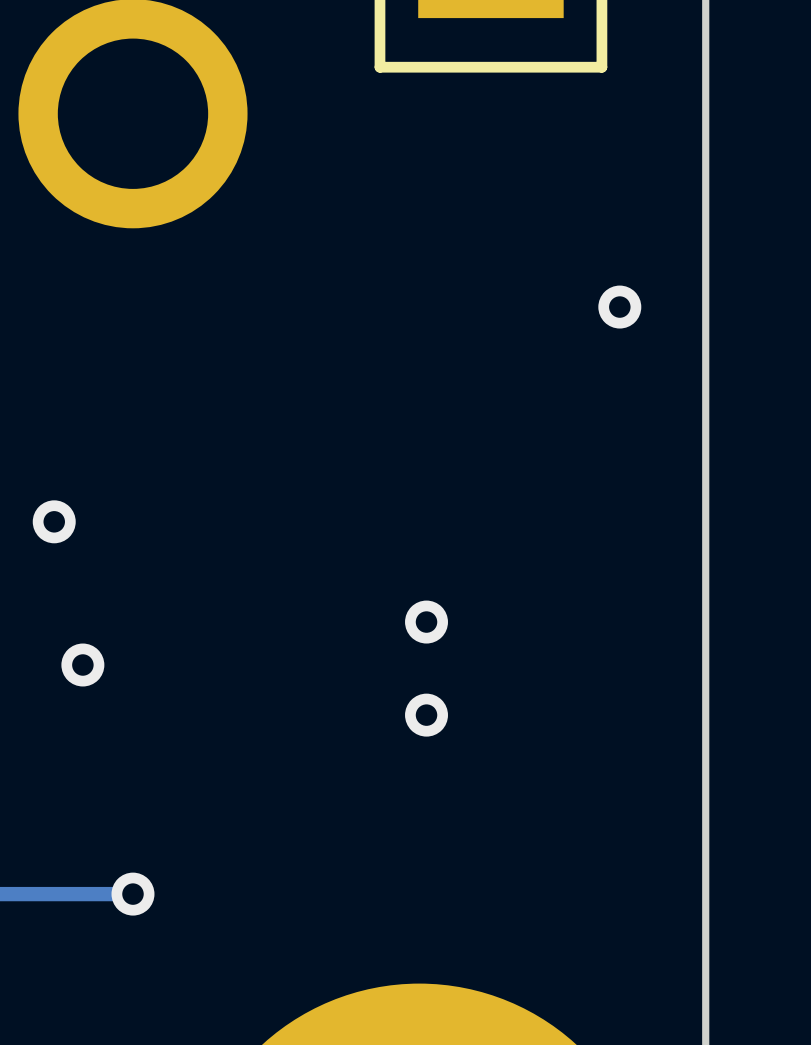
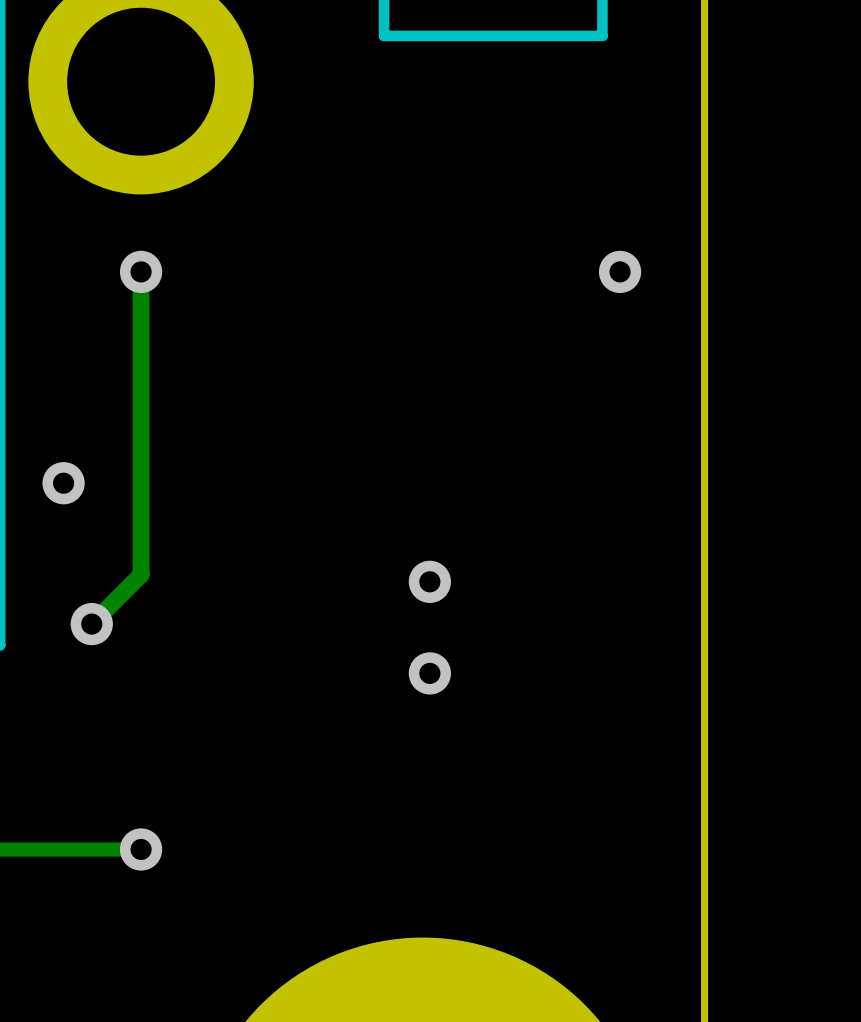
track: none -> (141, 271) (141, 574) (91, 624)
via: none -> (141, 271)

